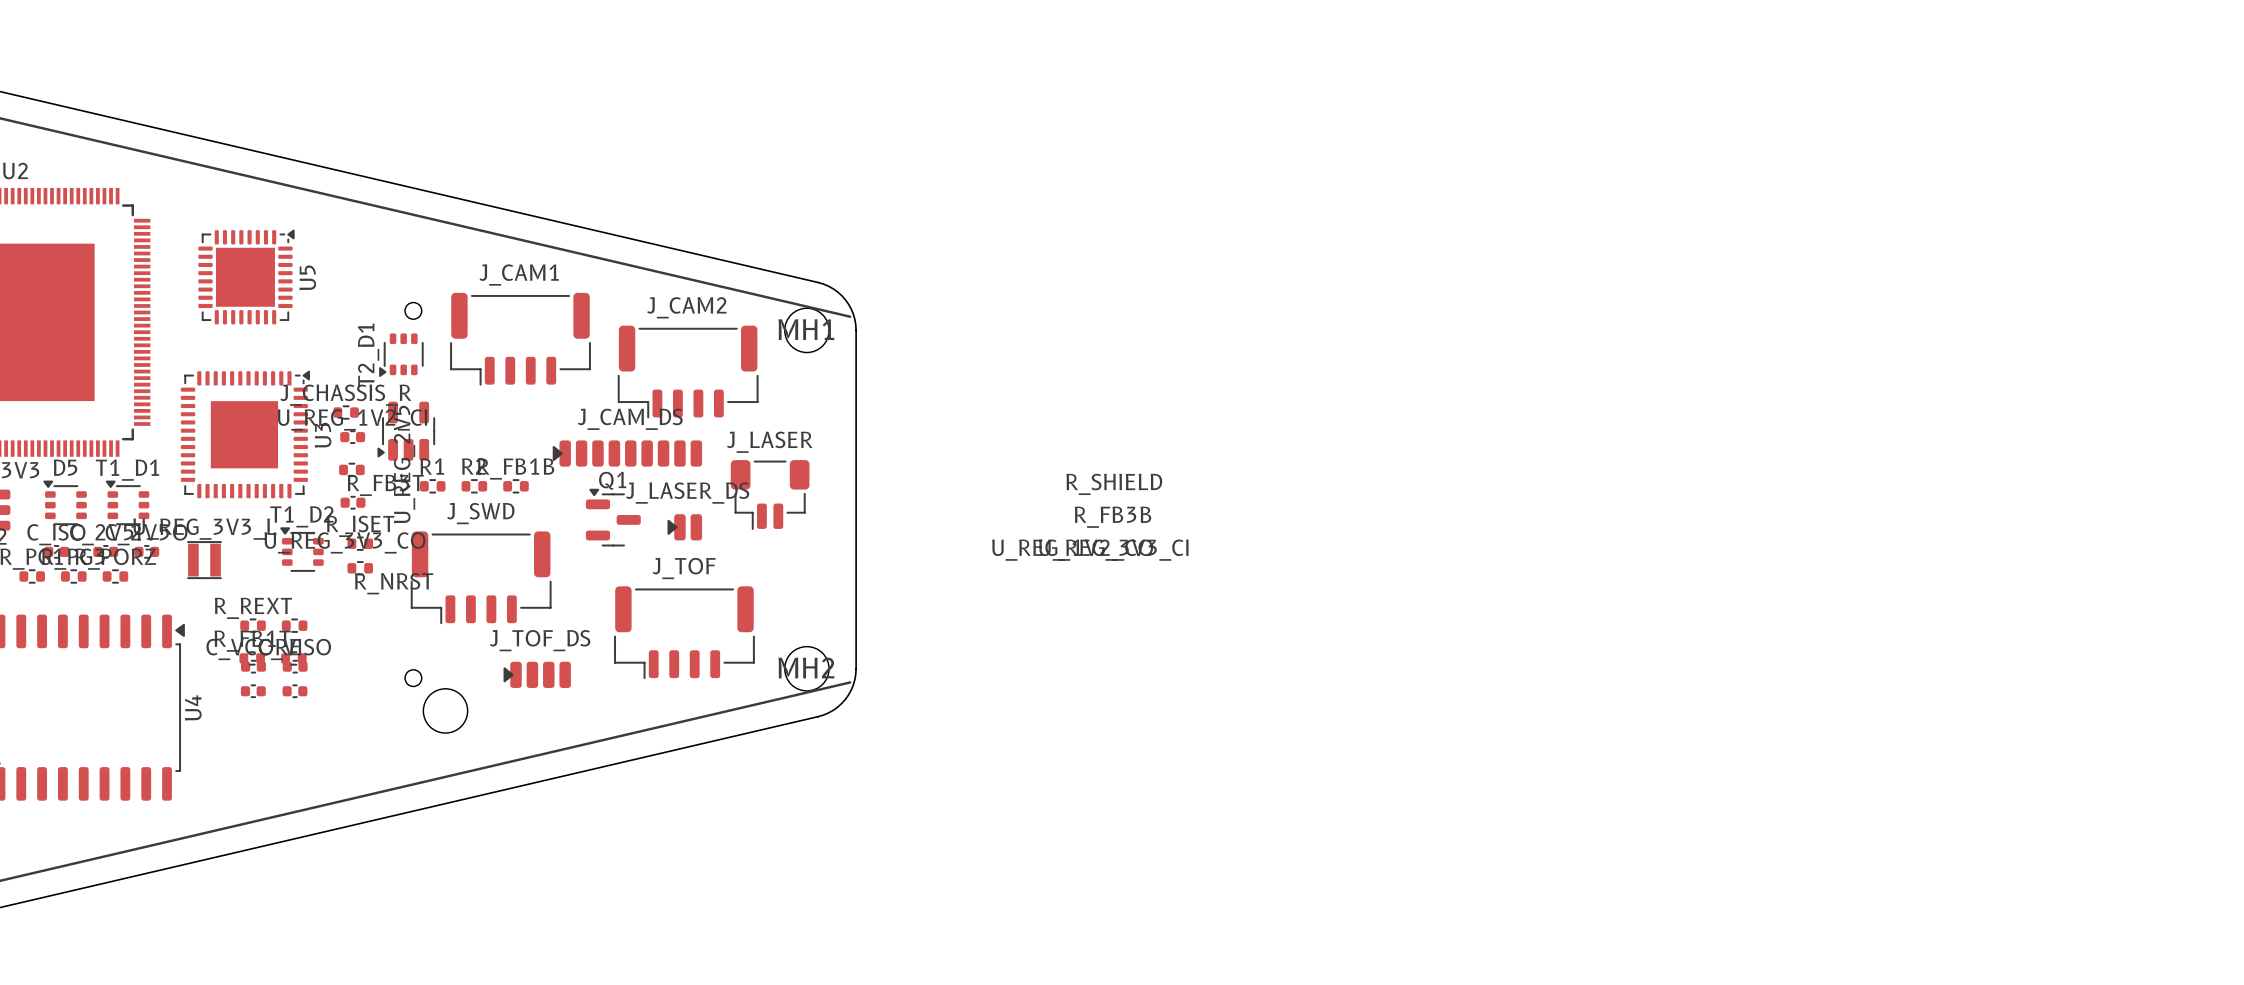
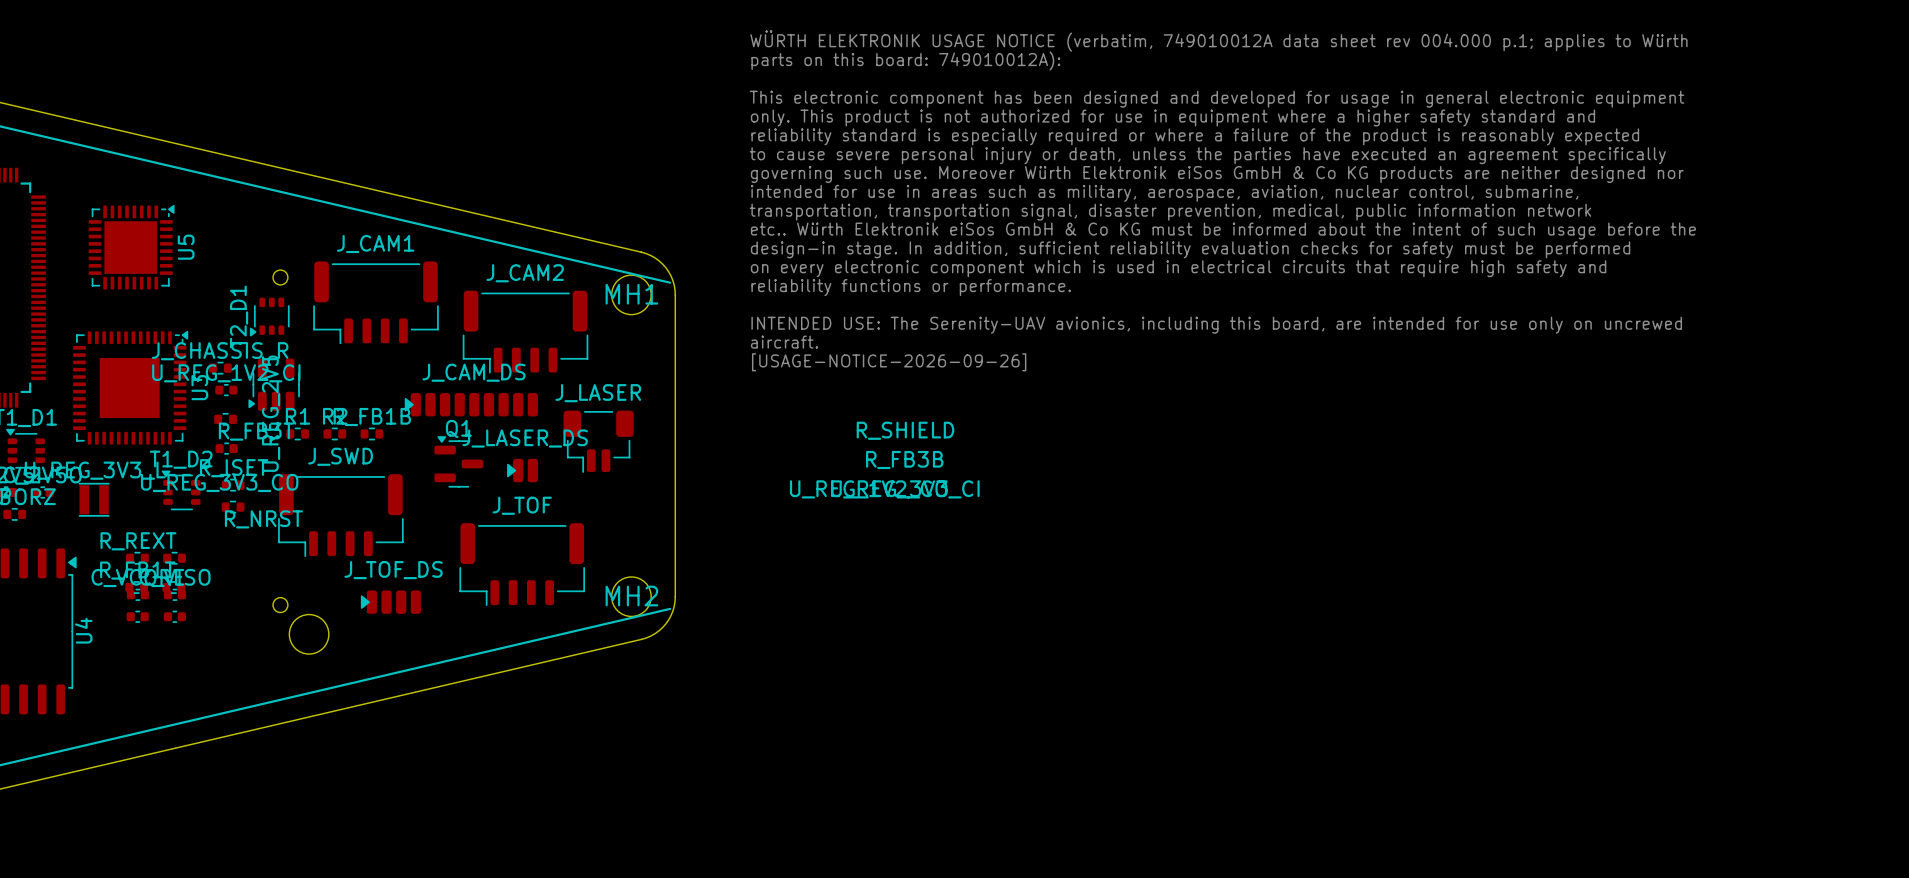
text: none -> WÜRTH ELEKTRONIK USAGE NOTICE (verbatim, 749010012A data sheet rev 004.000 p.1; applies to Würth (1218, 41)
text: none -> parts on this board: 749010012A): (905, 60)
text: none -> This electronic component has been designed and developed for usage in general electronic equipment (1217, 99)
text: none -> only. This product is not authorized for use in equipment where a higher safety standard and (1172, 118)
text: none -> reliability standard is especially required or where a failure of the product is reasonably expected (1195, 136)
text: none -> to cause severe personal injury or death, unless the parties have executed an agreement specifically (1207, 155)
text: none -> governing such use. Moreover Würth Elektronik eiSos GmbH & Co KG products are neither designed nor (1217, 174)
text: none -> intended for use in areas such as military, aerospace, aviation, nuclear control, submarine, (1164, 193)
text: none -> transportation, transportation signal, disaster prevention, medical, public information network (1170, 212)
text: none -> etc.. Würth Elektronik eiSos GmbH & Co KG must be informed about the intent of such usage before the (1223, 231)
text: none -> design-in stage. In addition, sufficient reliability evaluation checks for safety must be performed (1190, 249)
text: none -> on every electronic component which is used in electrical circuits that require high safety and (1178, 268)
text: none -> reliability functions or performance. (911, 287)
text: none -> INTENDED USE: The Serenity-UAV avionics, including this board, are intended for use only on uncrewed (1216, 325)
text: none -> aircraft. (784, 342)
text: none -> [USAGE-NOTICE-2026-09-26] (889, 362)

